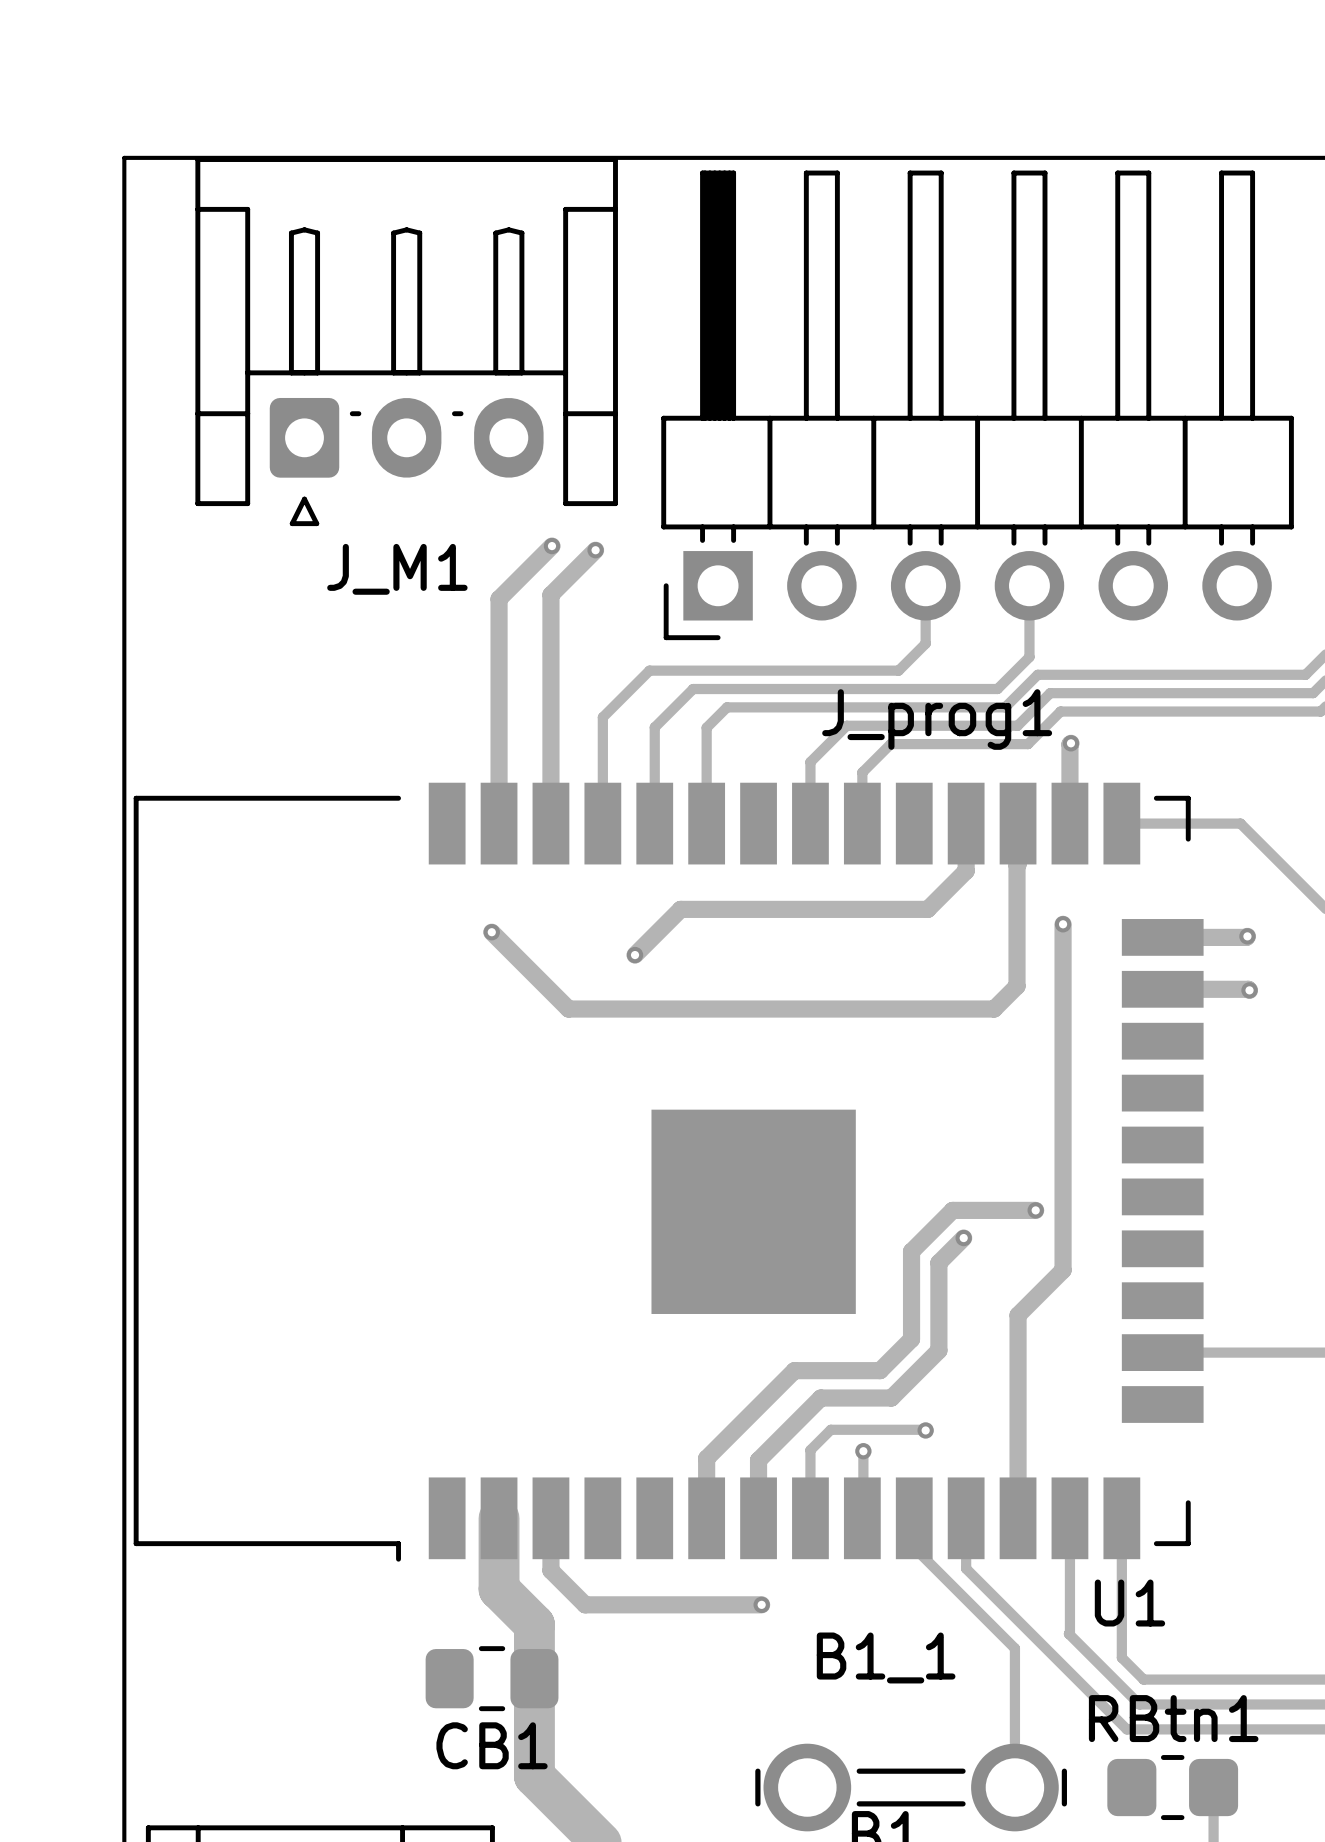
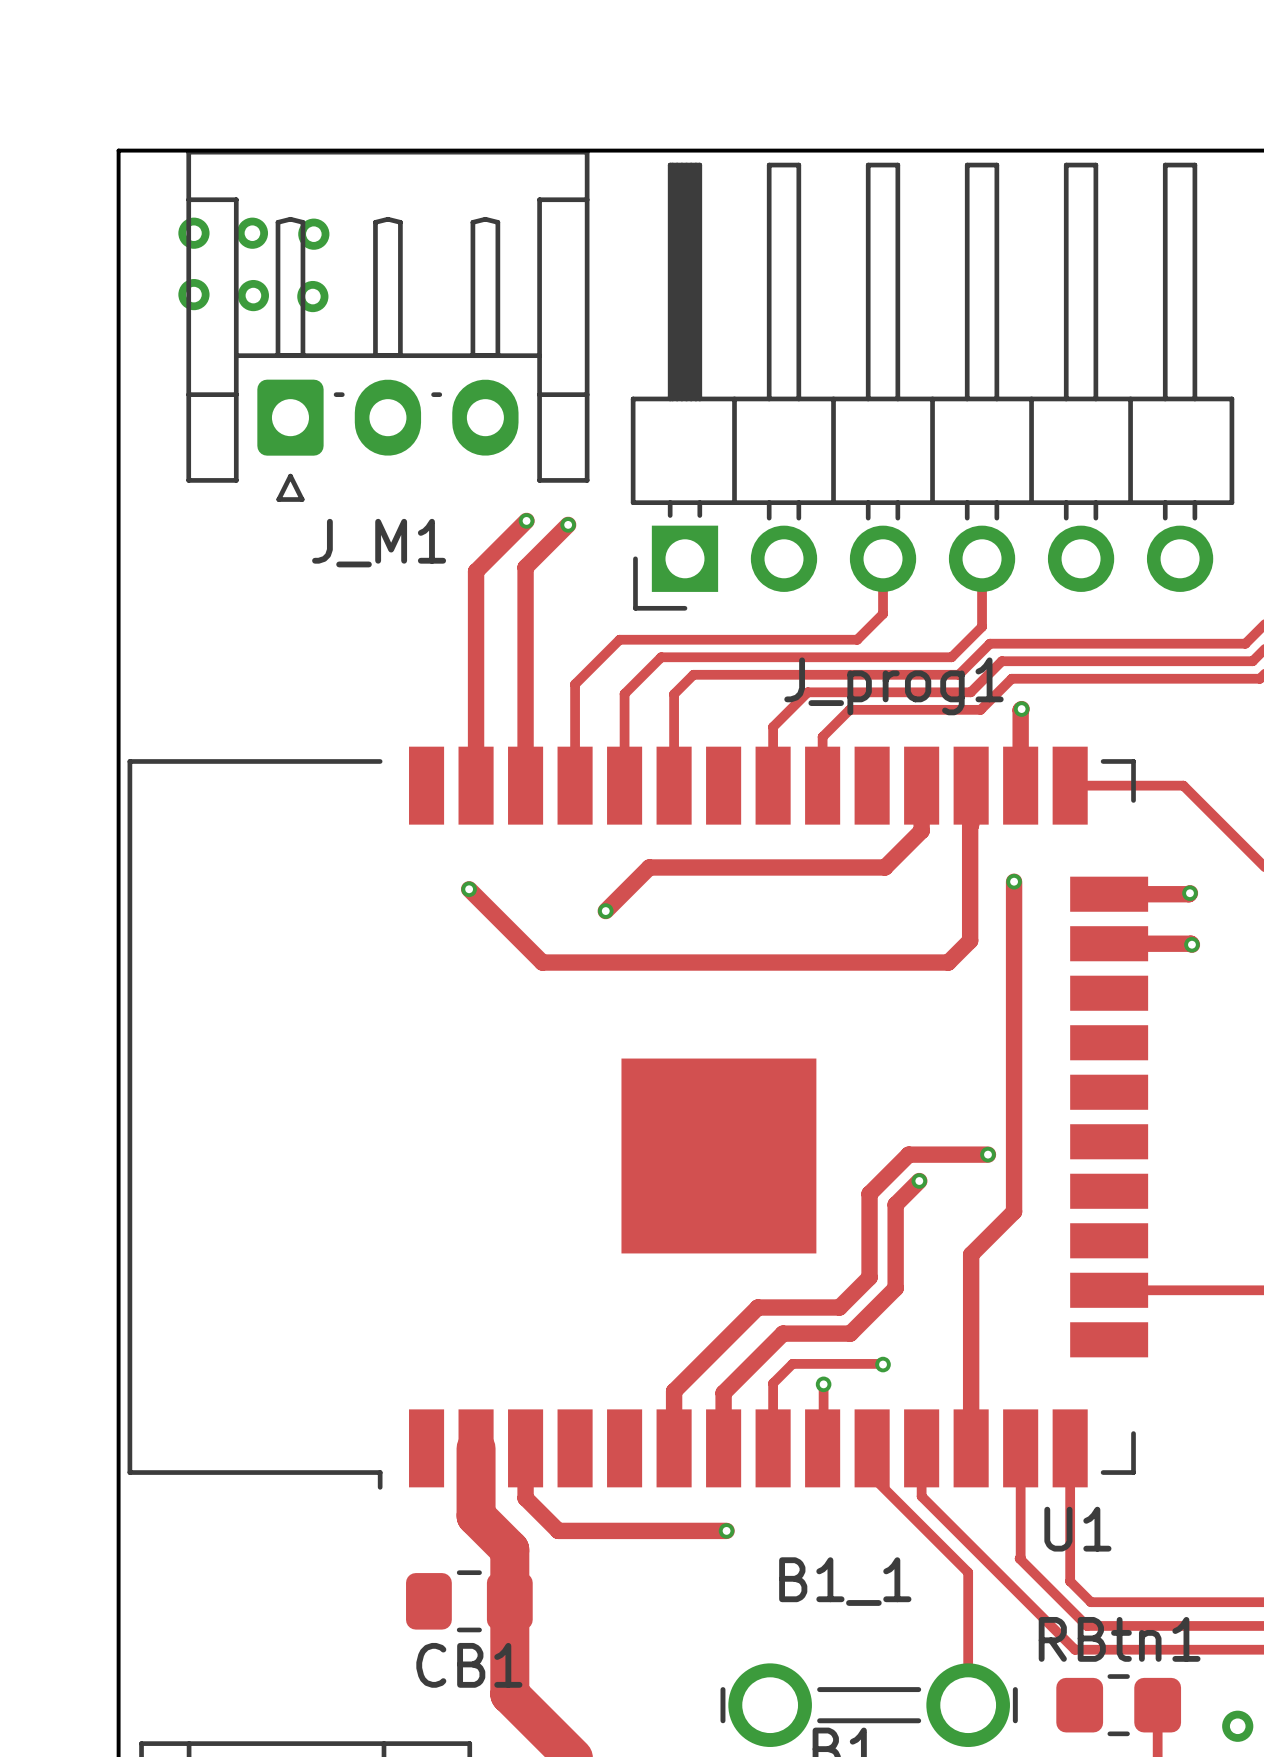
via: none -> (193, 233)
via: none -> (252, 233)
via: none -> (313, 234)
via: none -> (193, 294)
via: none -> (253, 295)
via: none -> (312, 296)
via: none -> (1237, 1726)

